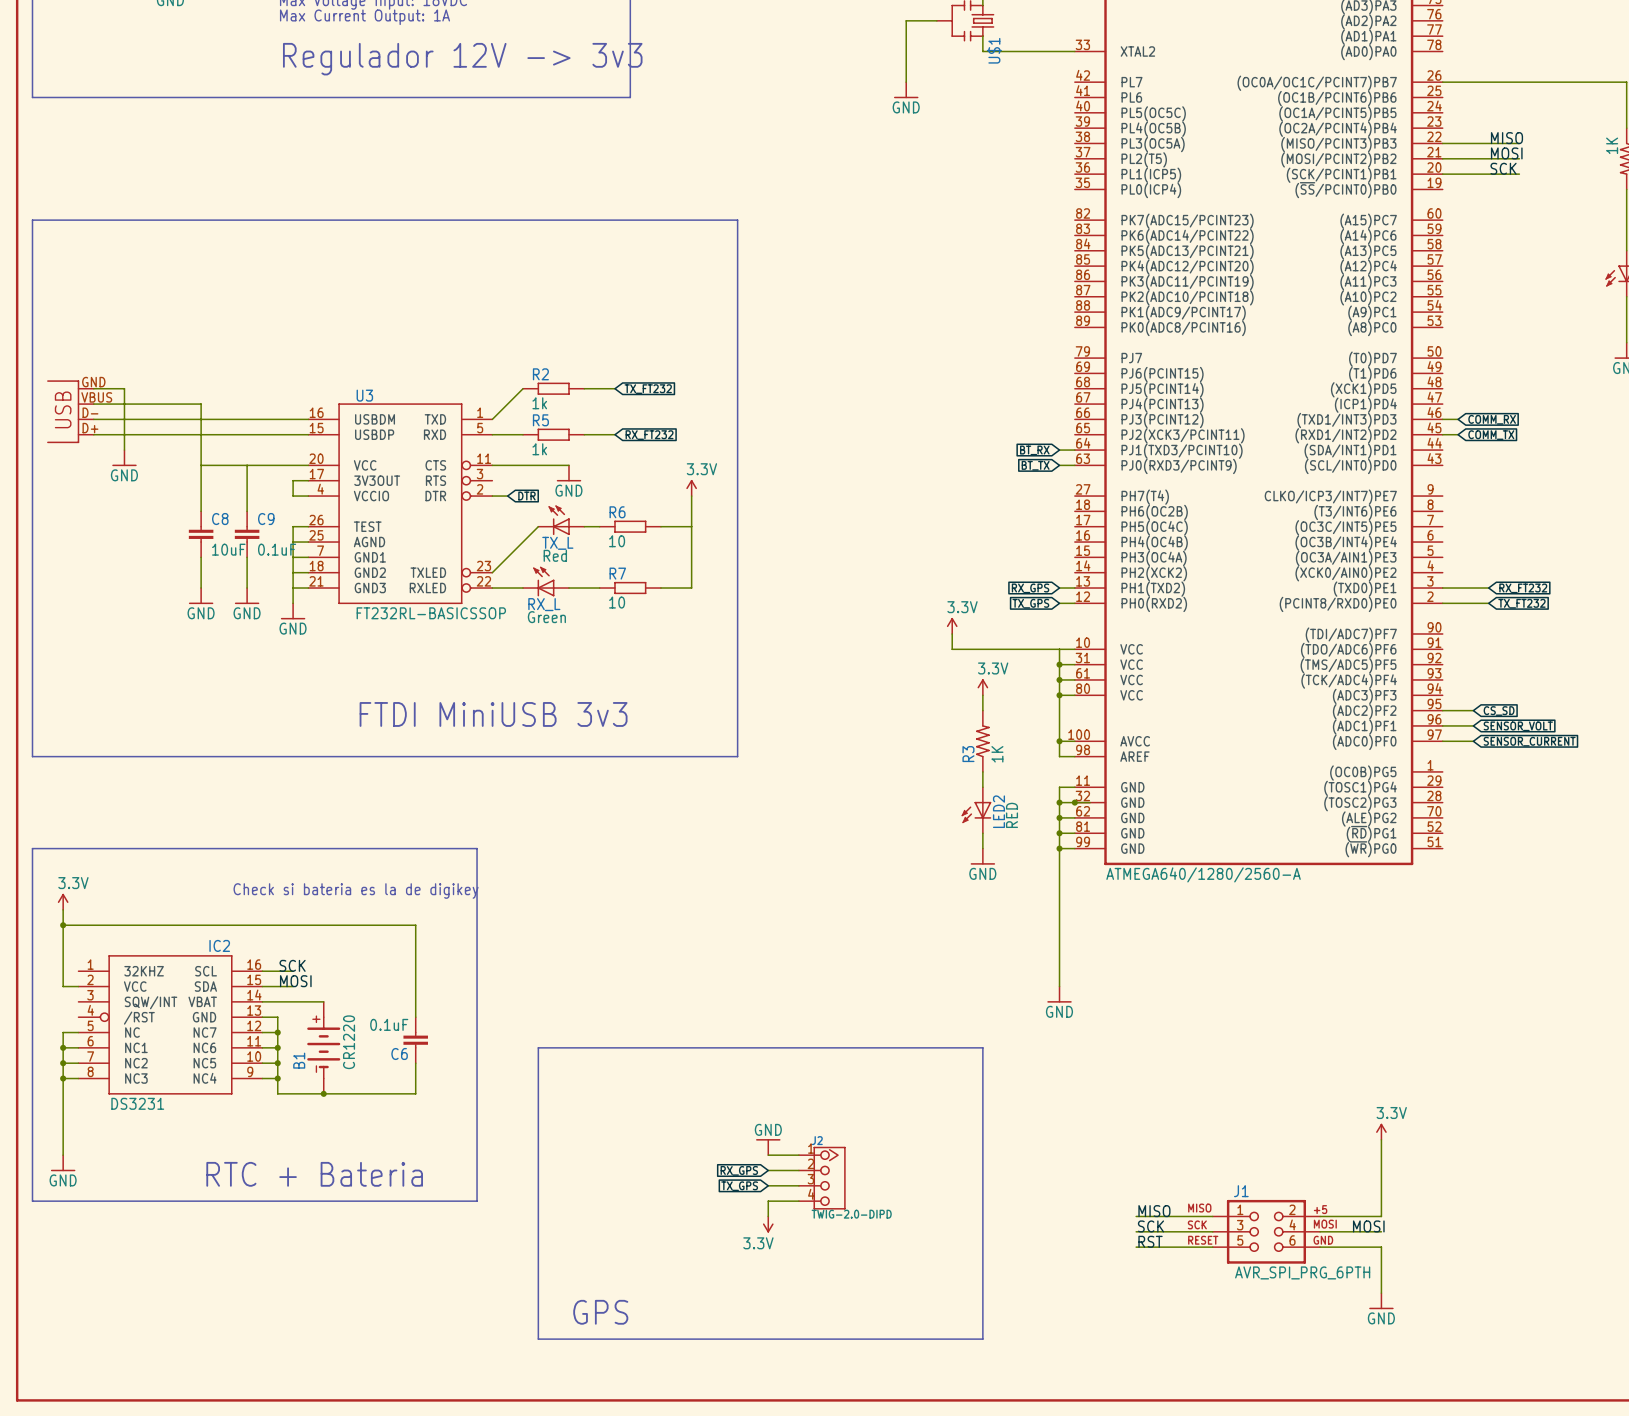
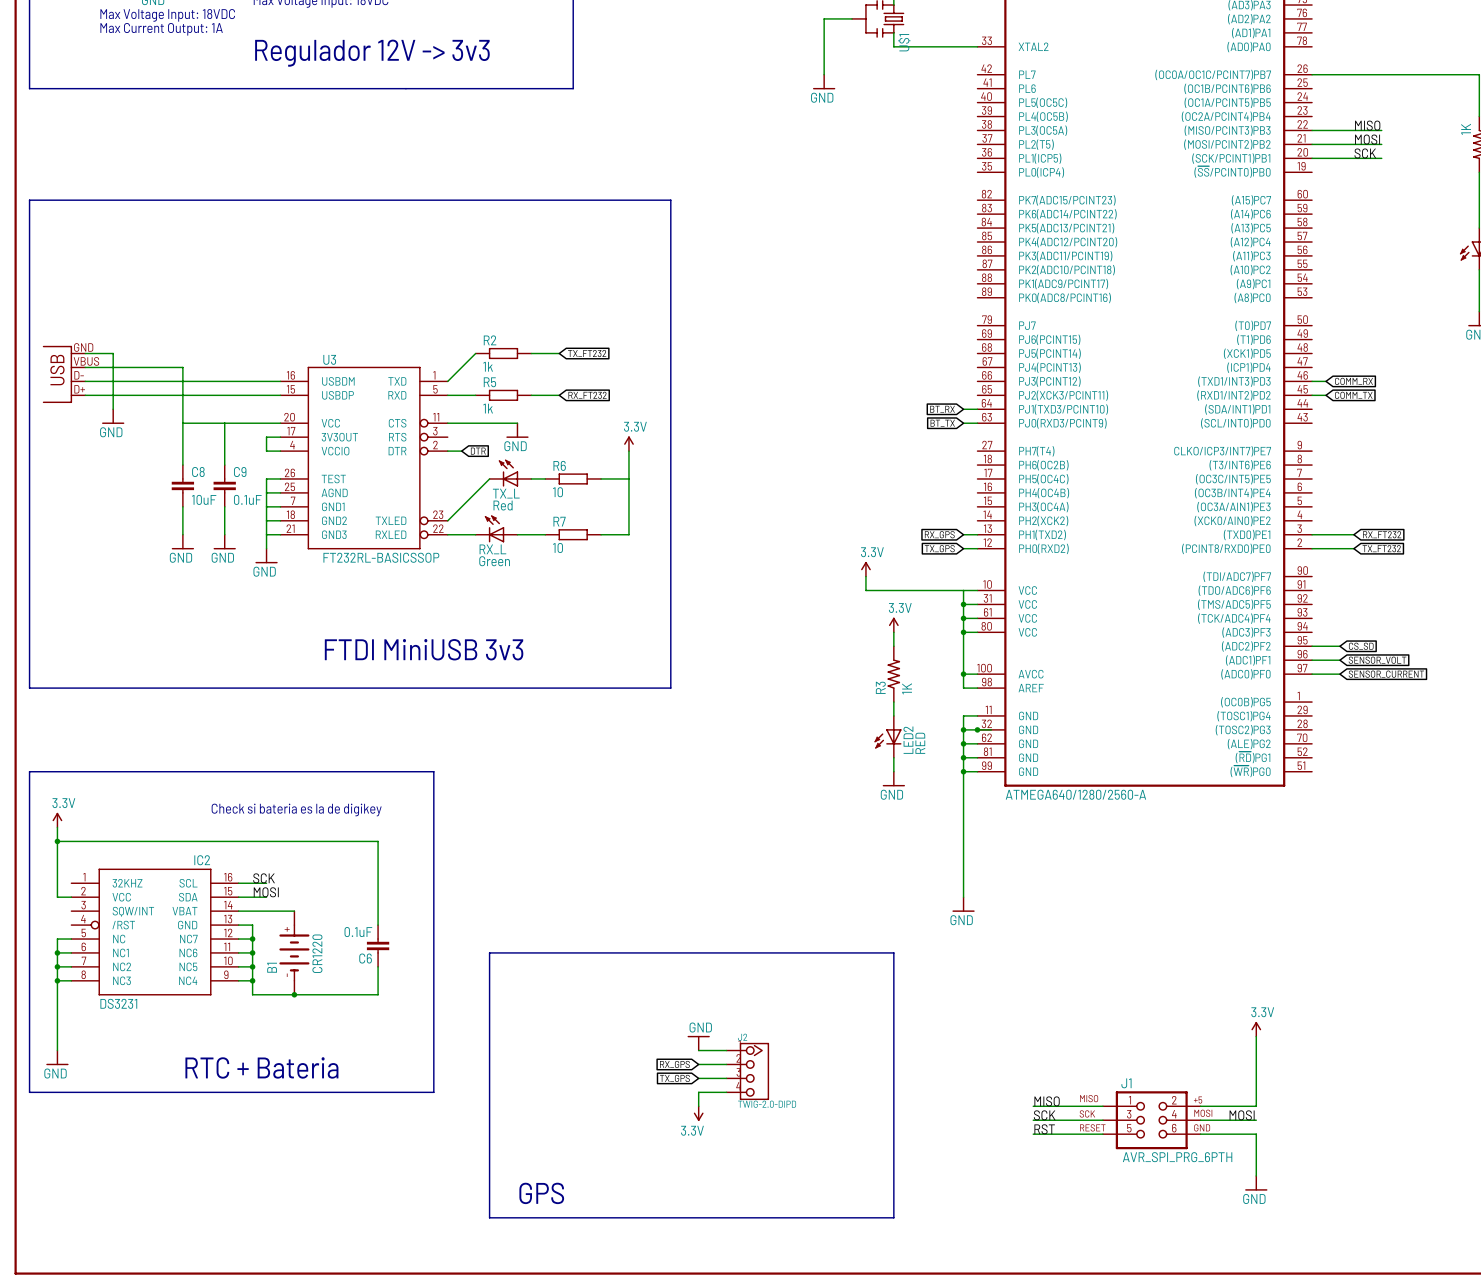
text: none -> Max Voltage Input: 18VDC (167, 15)
text: Max Current Output: 1A (365, 17) -> none
text: none -> Max Current Output: 1A (161, 29)

